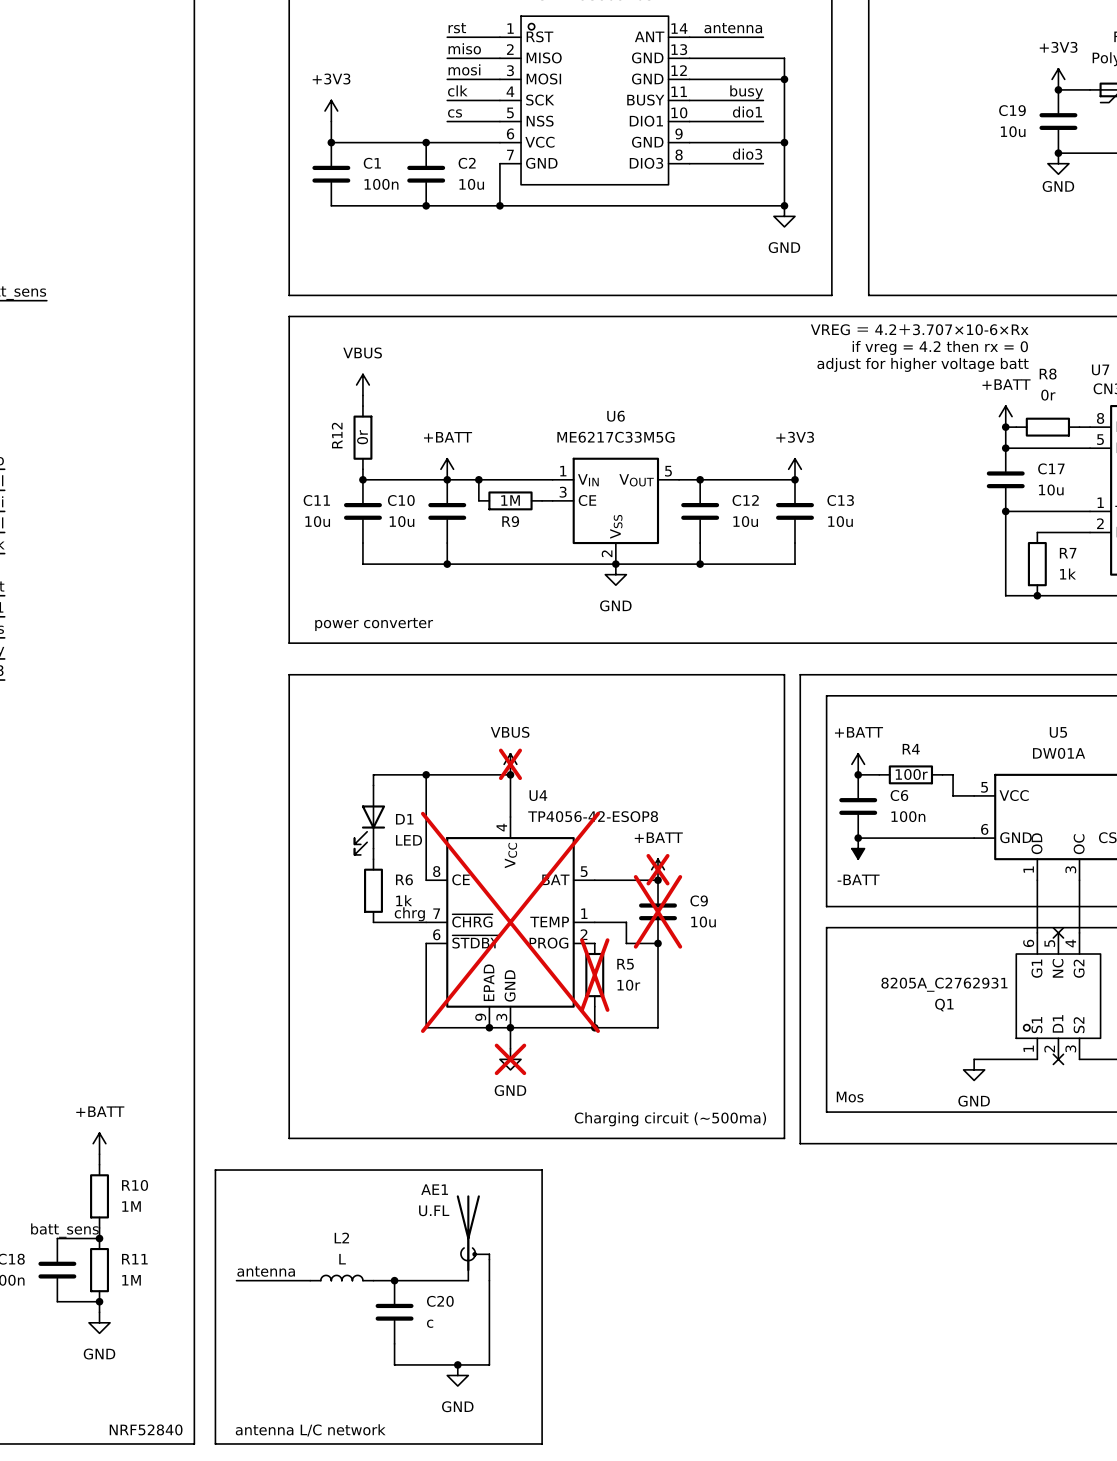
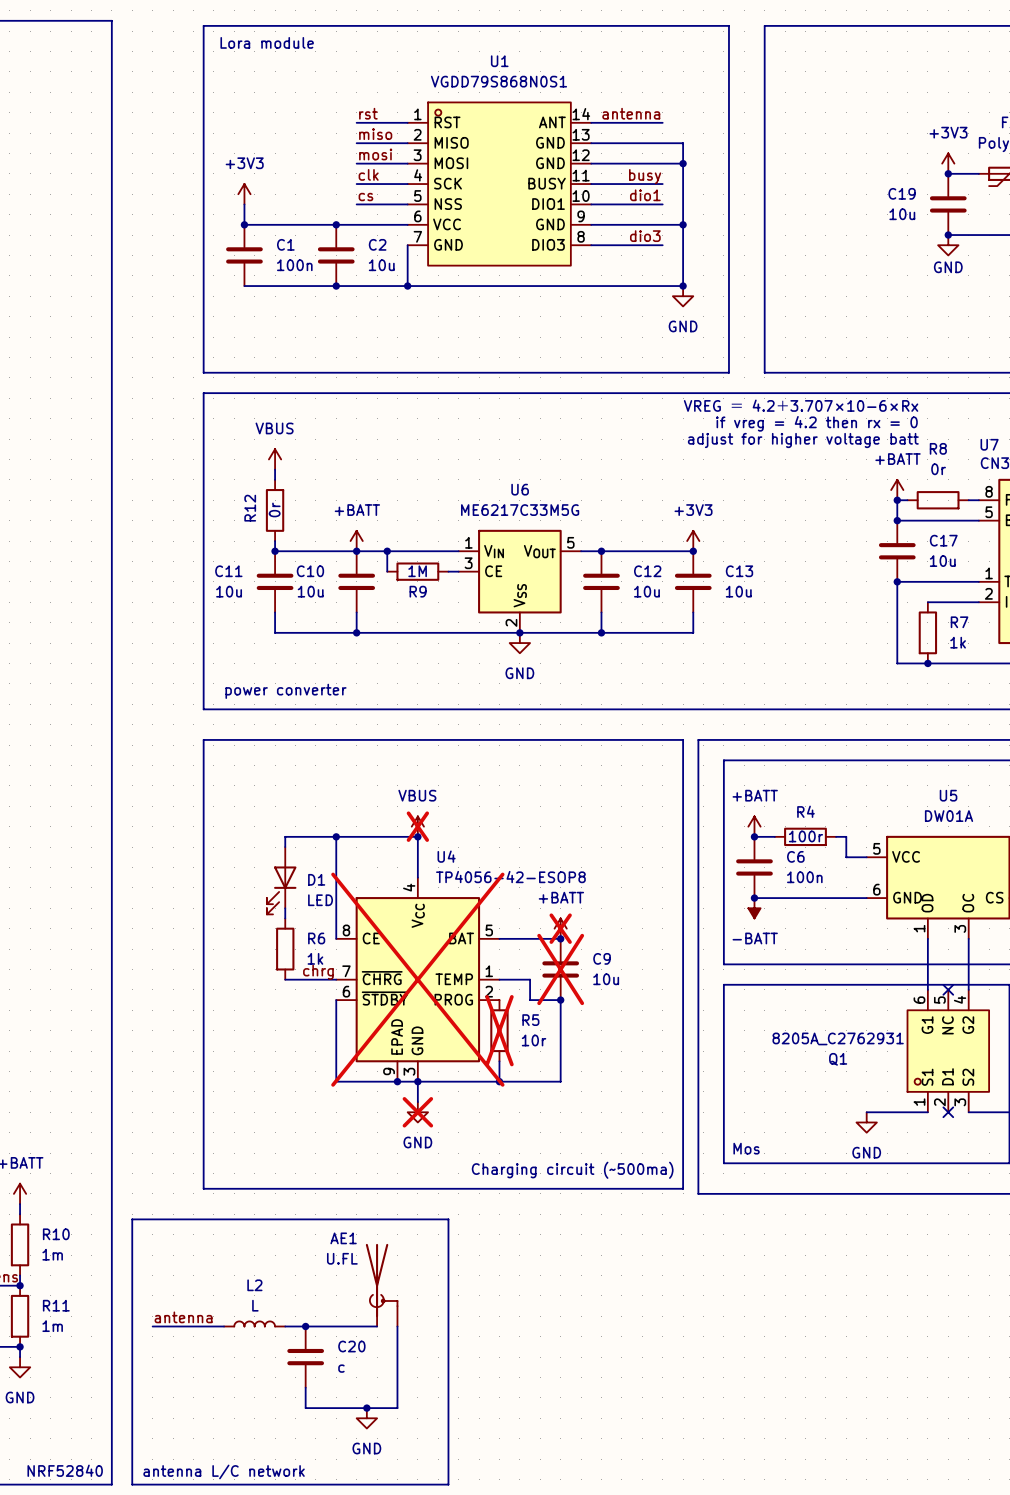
R10 value: 1M (131, 1206) -> 1m (52, 1254)
R11 value: 1M (131, 1280) -> 1m (52, 1326)

